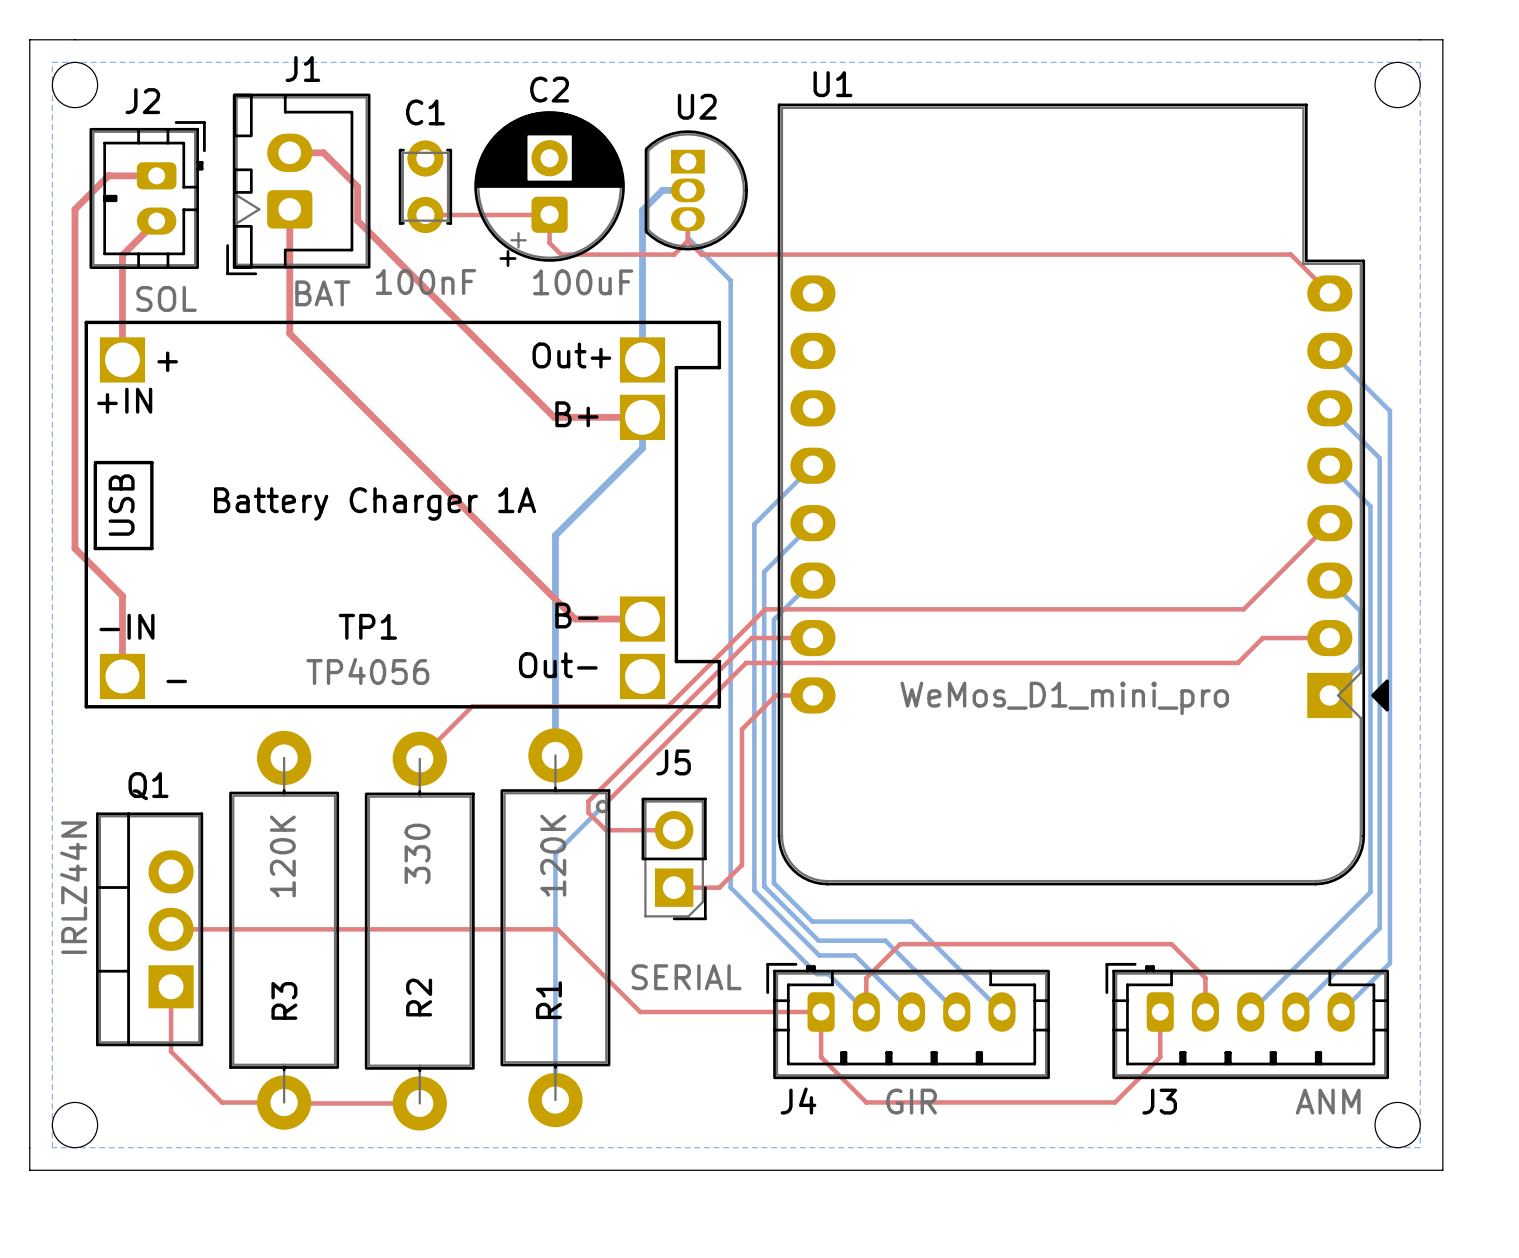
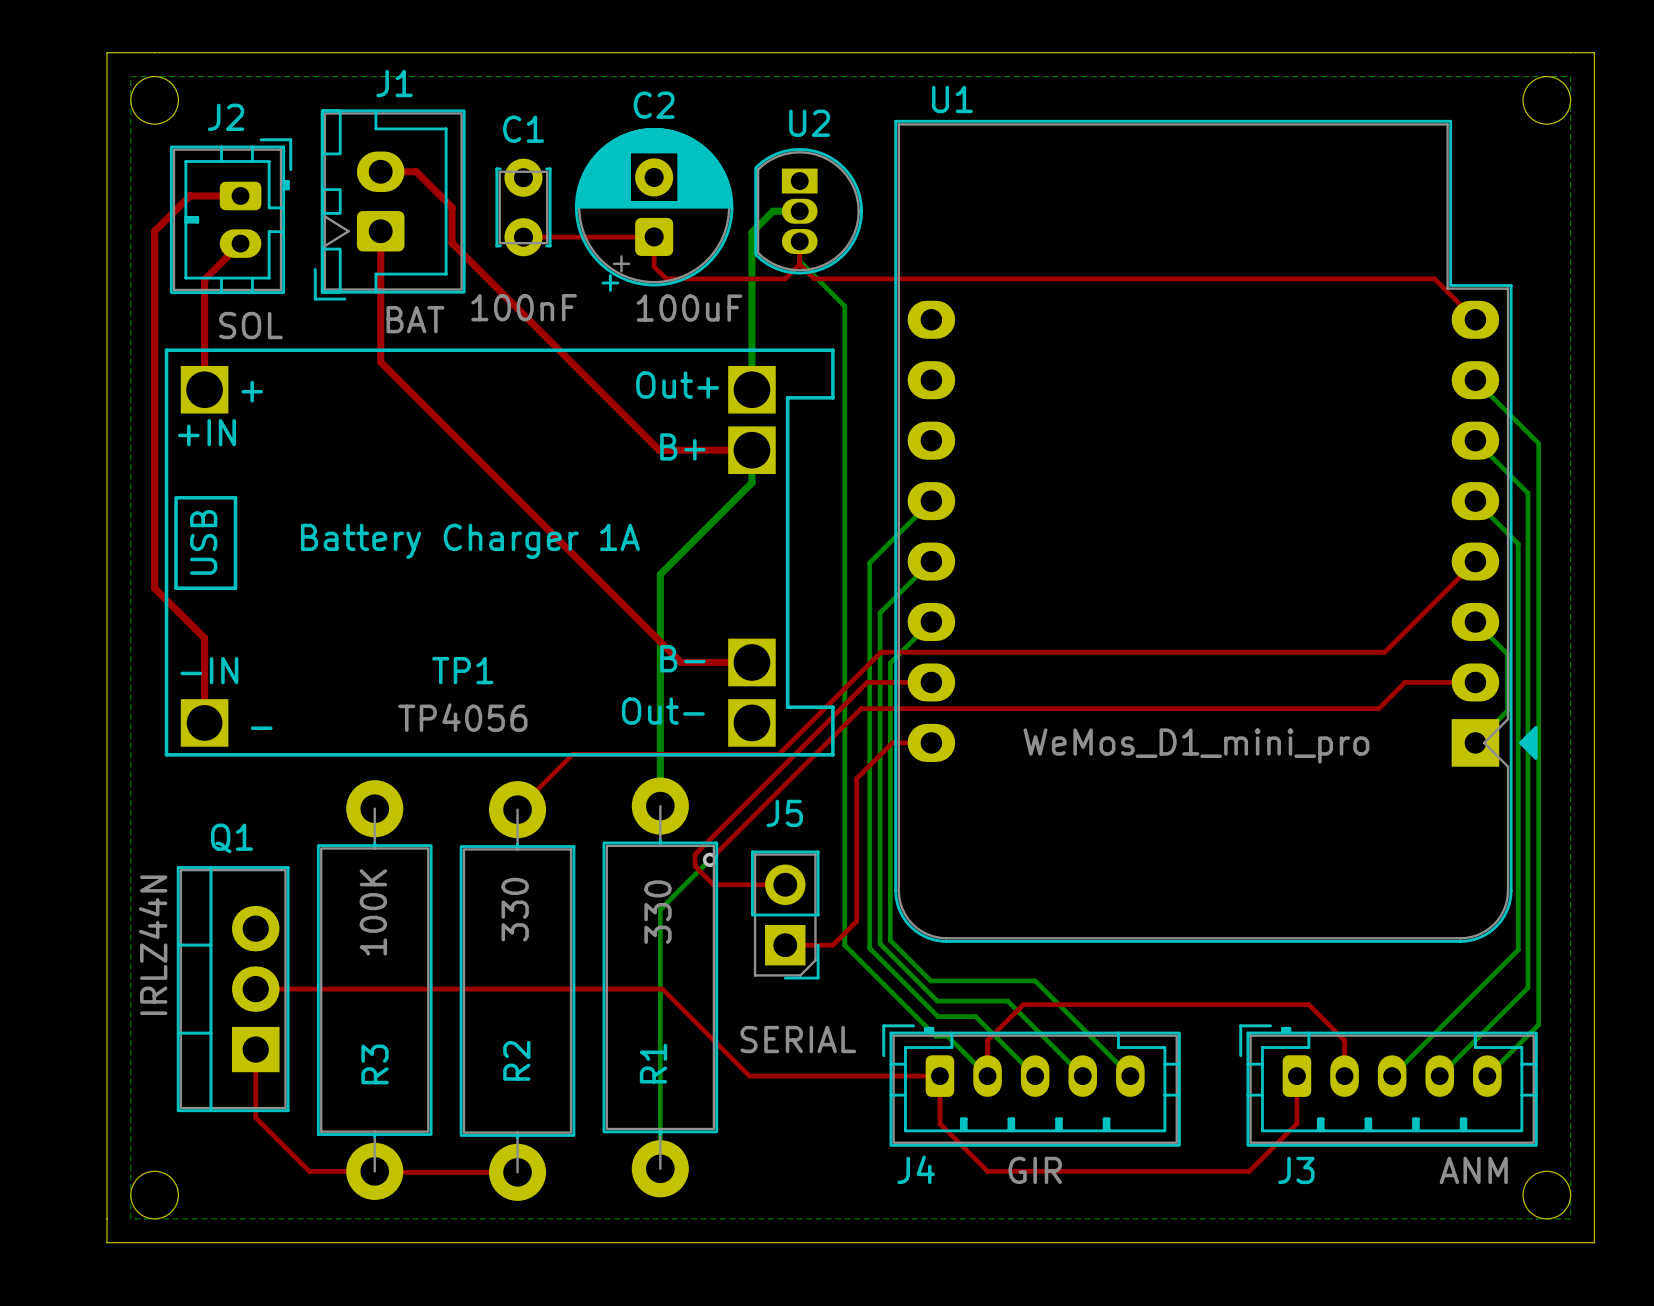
R1 value: 120K (553, 855) -> 330 (658, 912)
R3 value: 120K (282, 856) -> 100K (373, 912)

